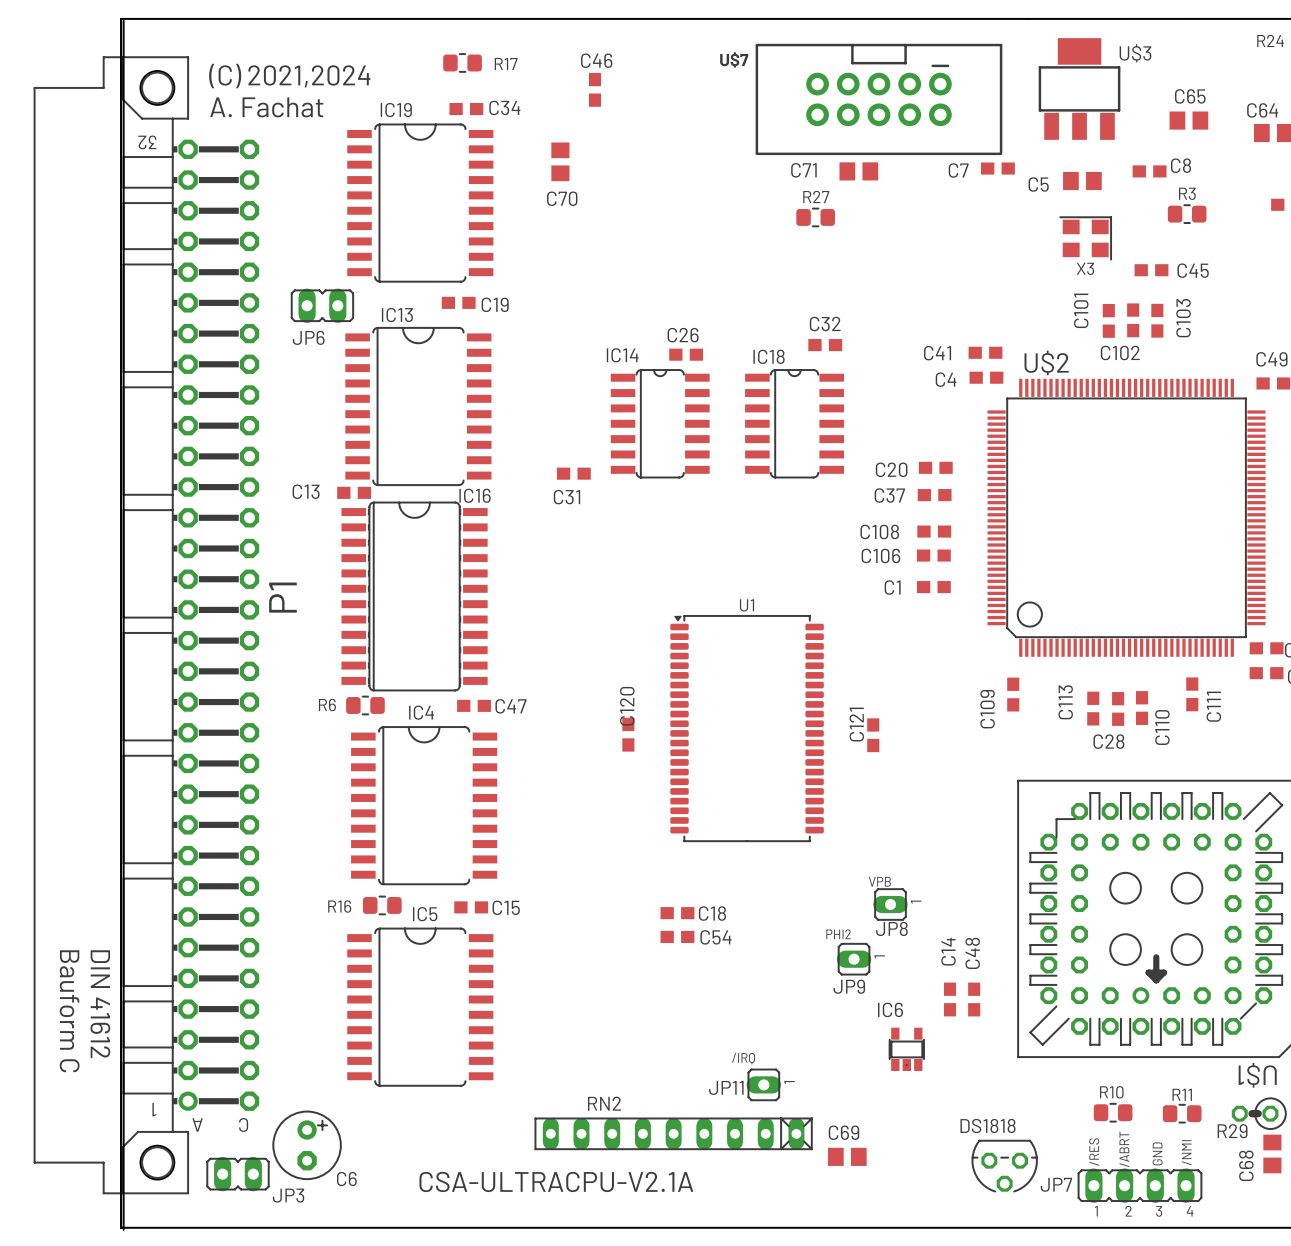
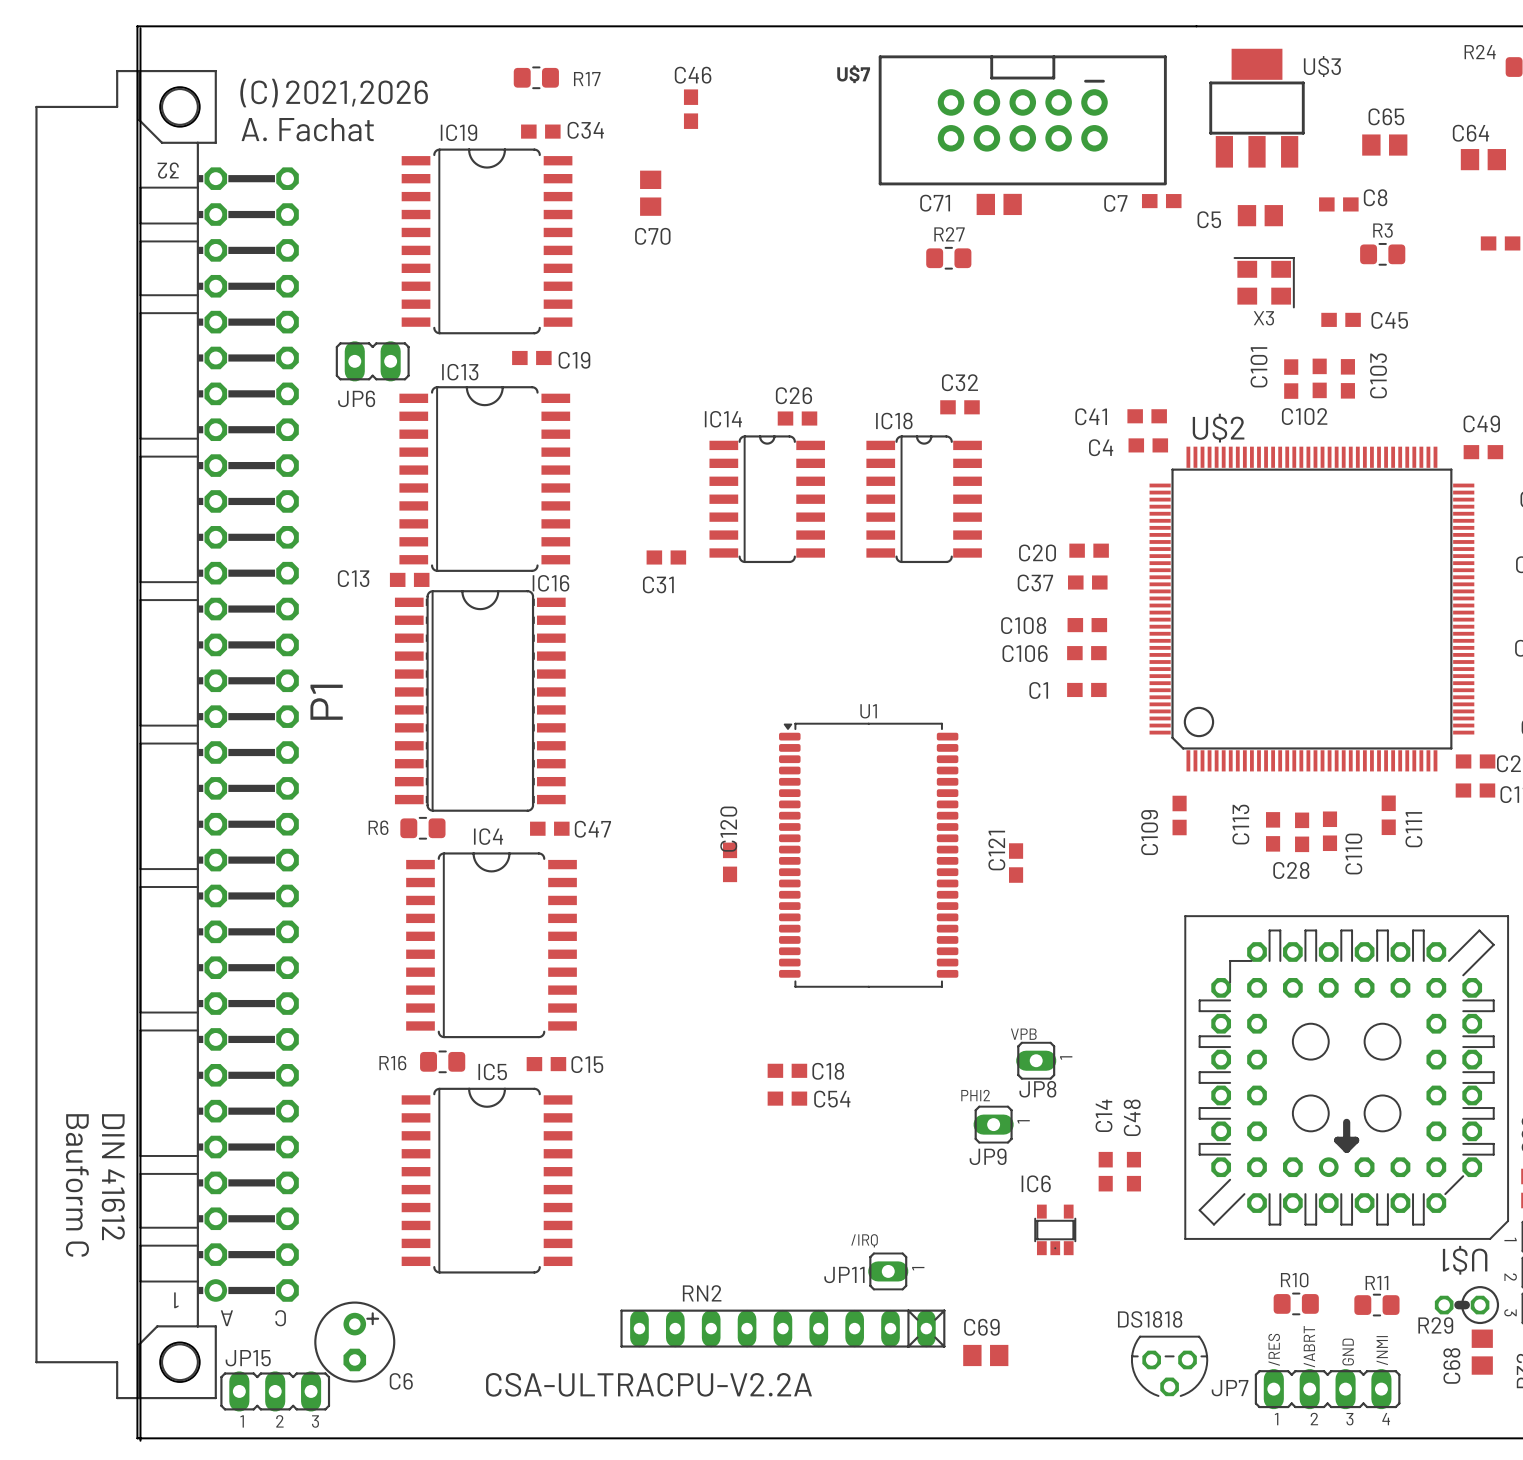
text: (C) 2021,2024 (289, 76) -> (C) 2021,2026 (334, 93)
JP3: (238, 1174) -> none
text: CSA-ULTRACPU-V2.1A (556, 1181) -> CSA-ULTRACPU-V2.2A (648, 1384)
JP15: none -> (275, 1391)

